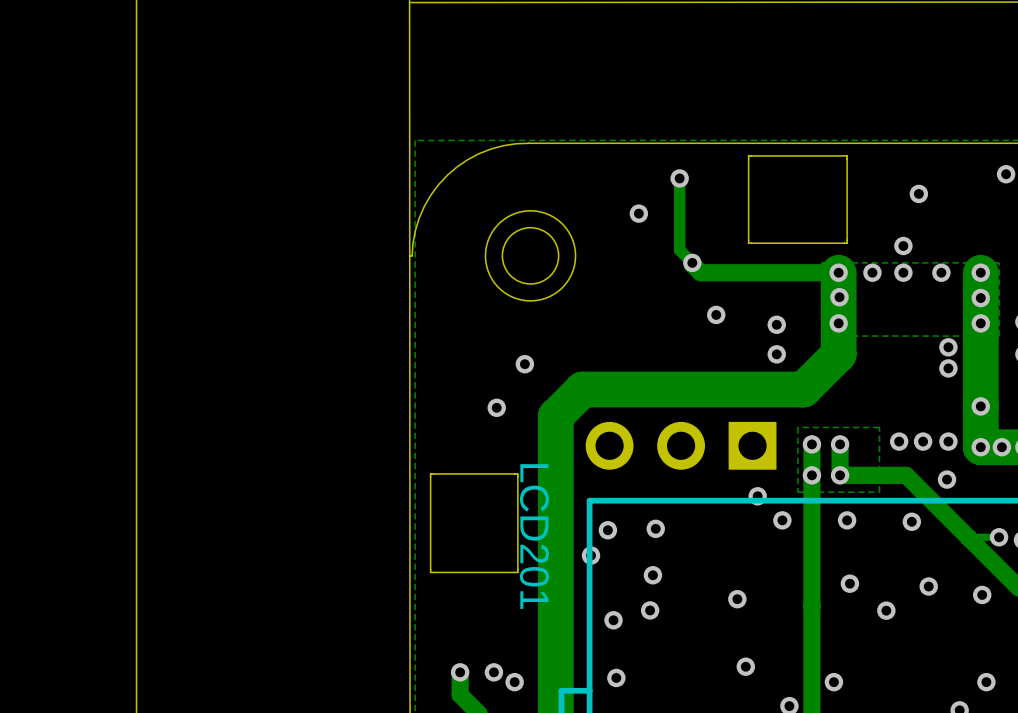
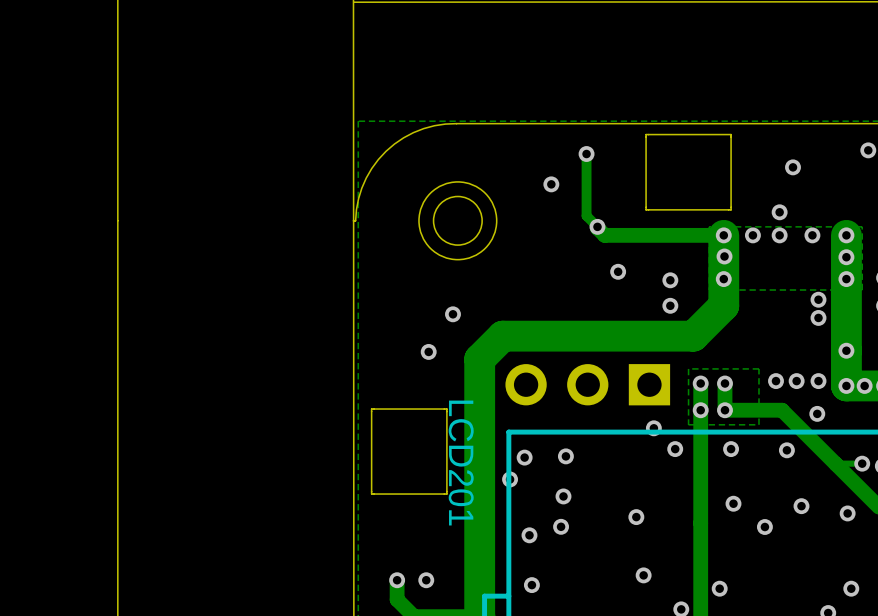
via: (514, 682) -> none

